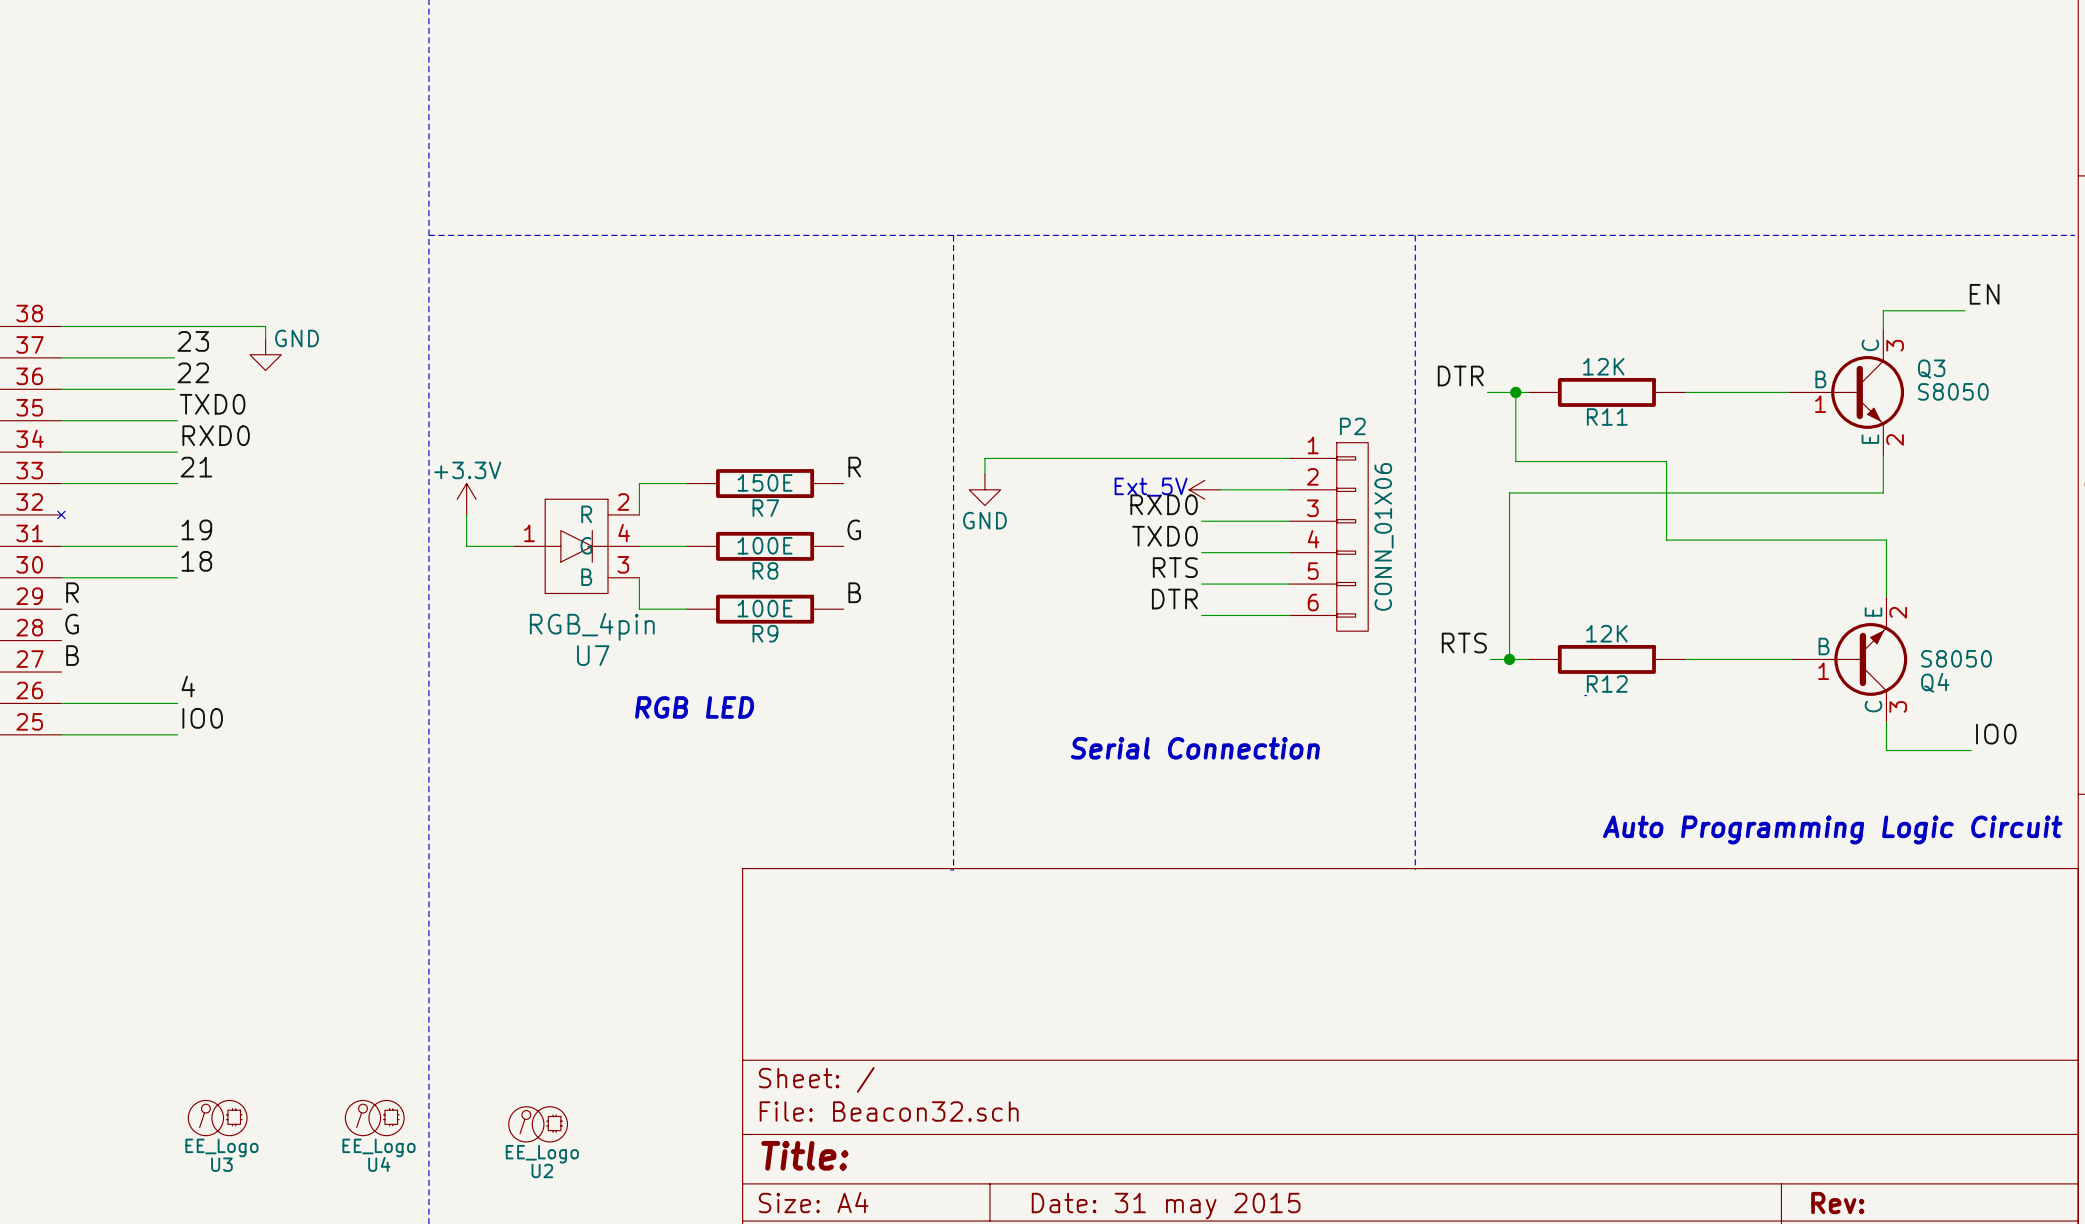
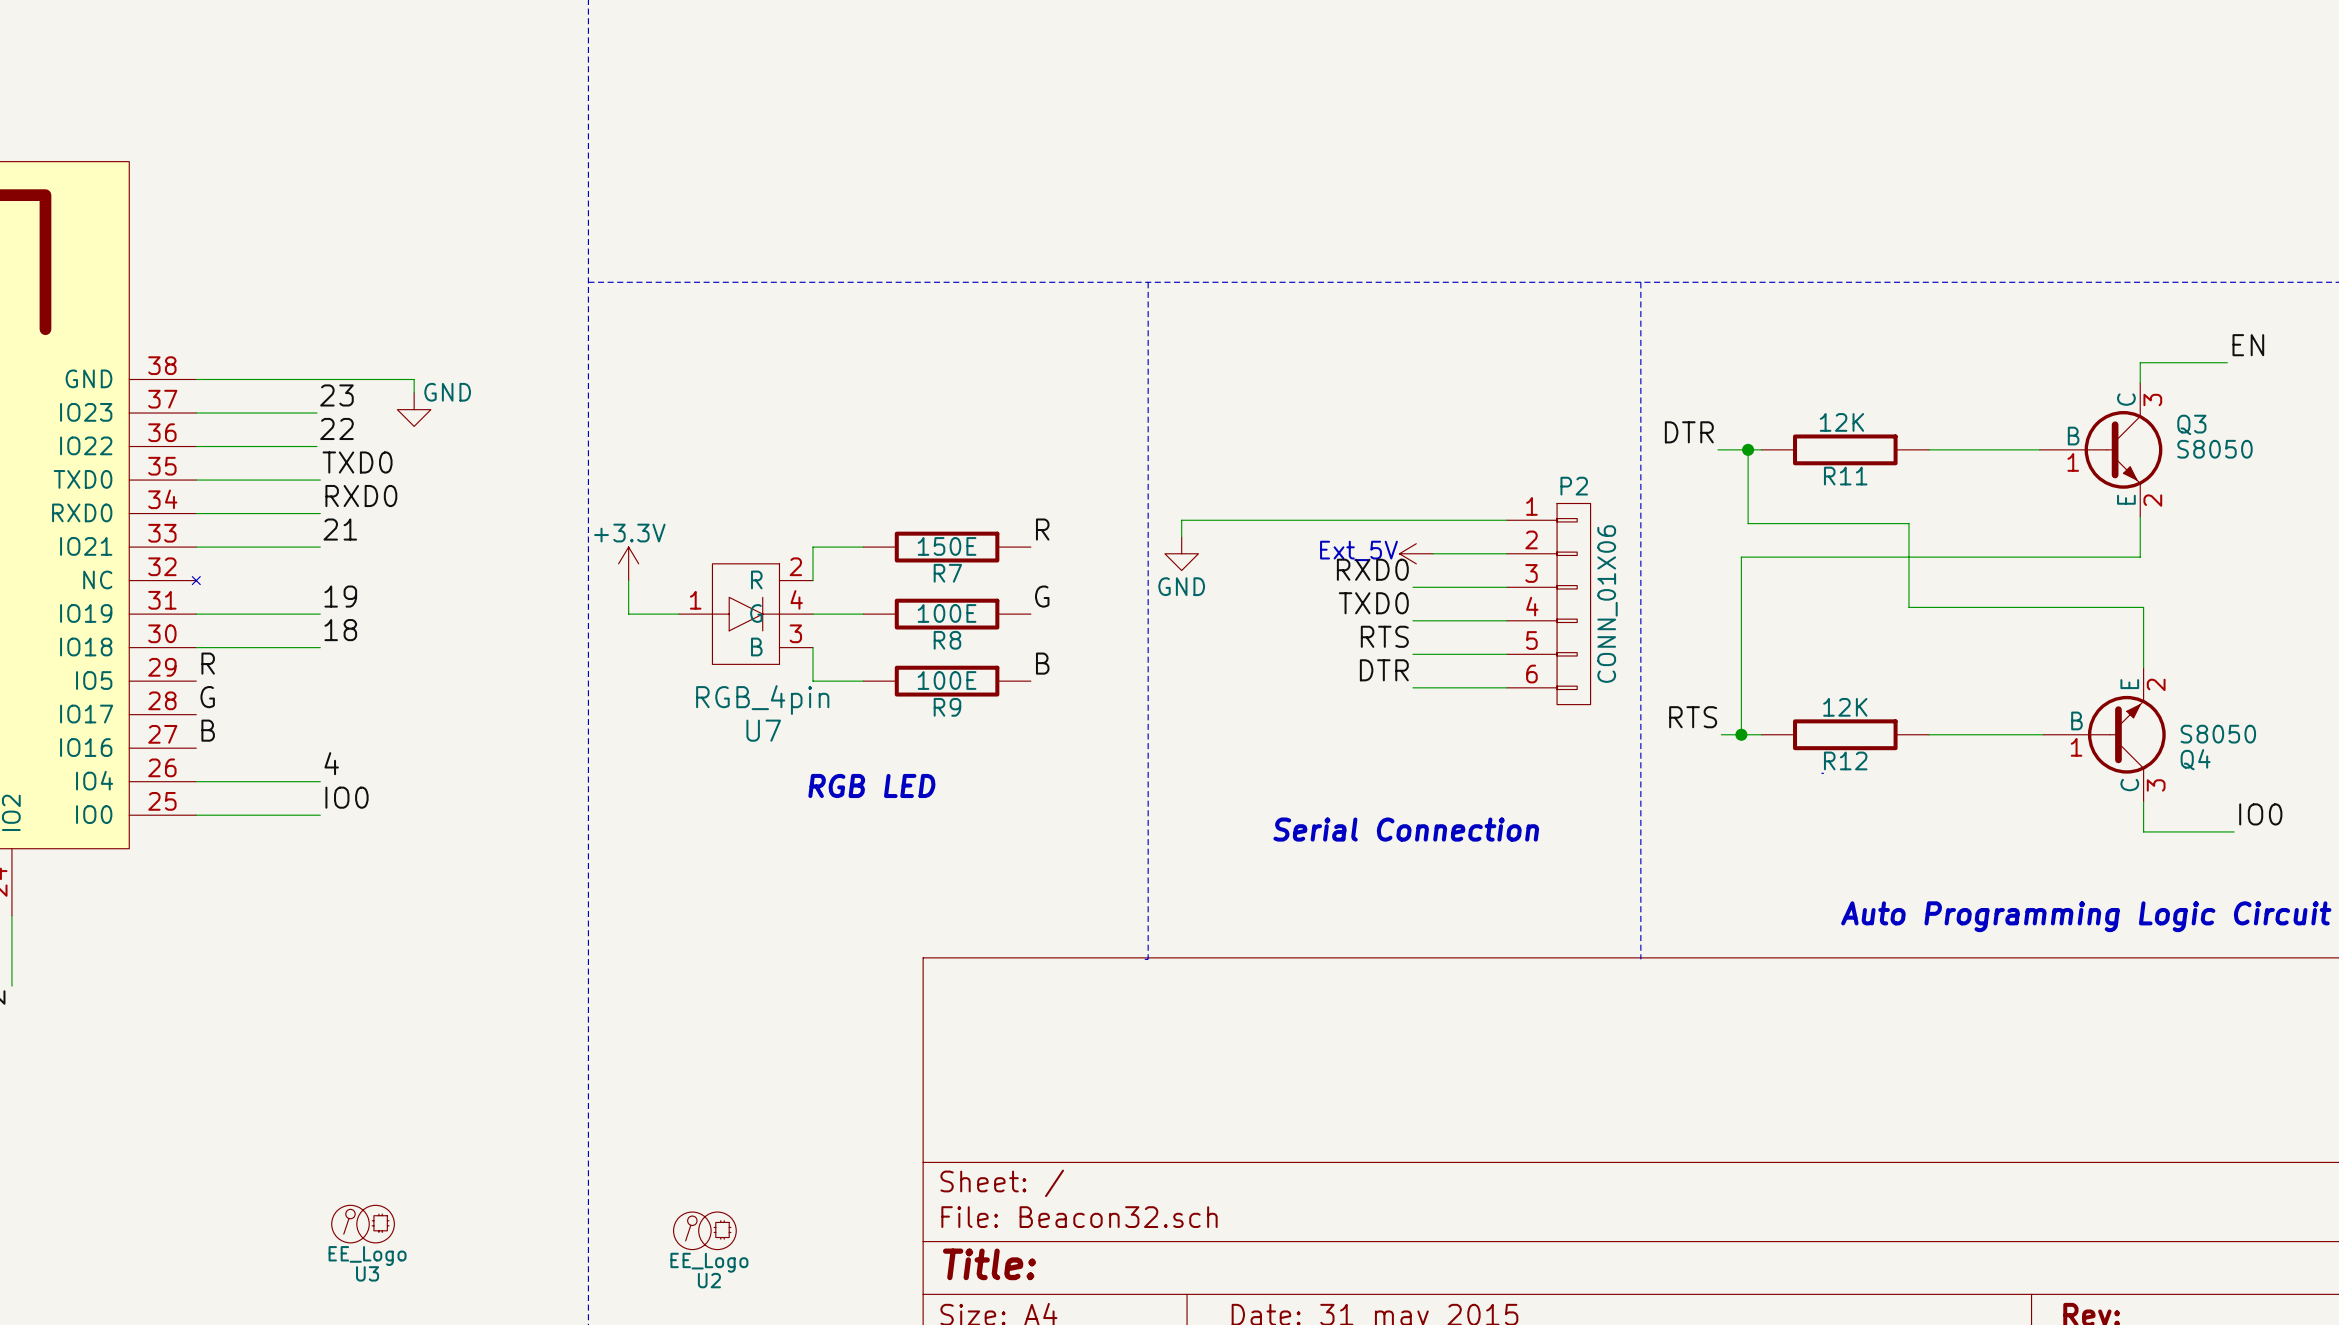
U4: EE_Logo (374, 1118) -> none

